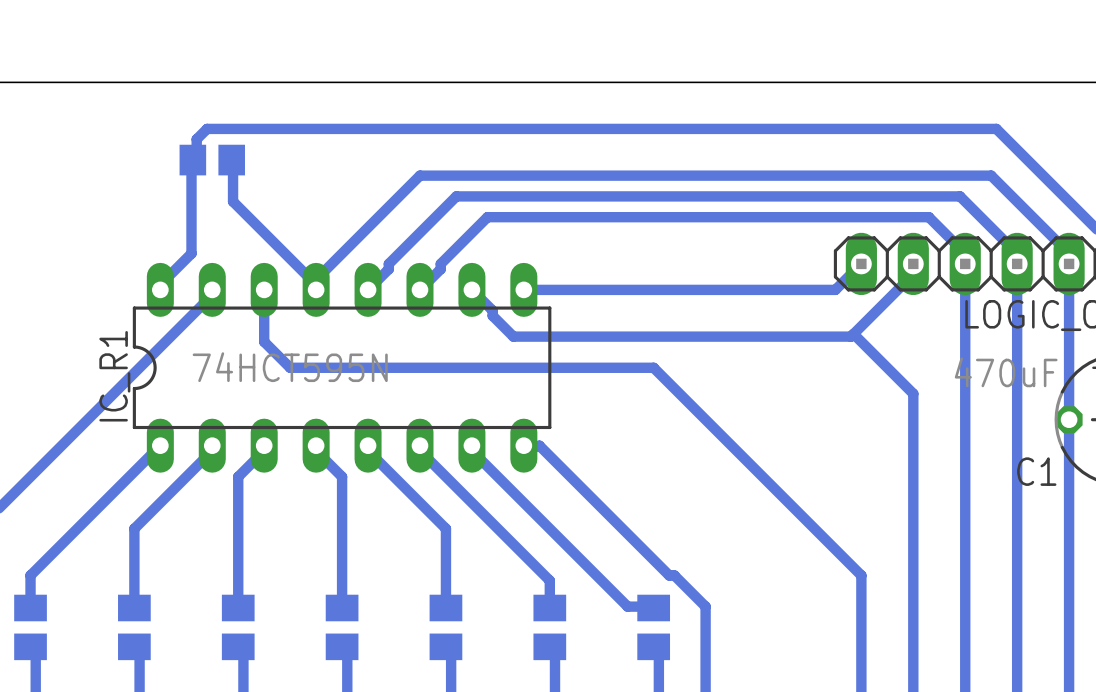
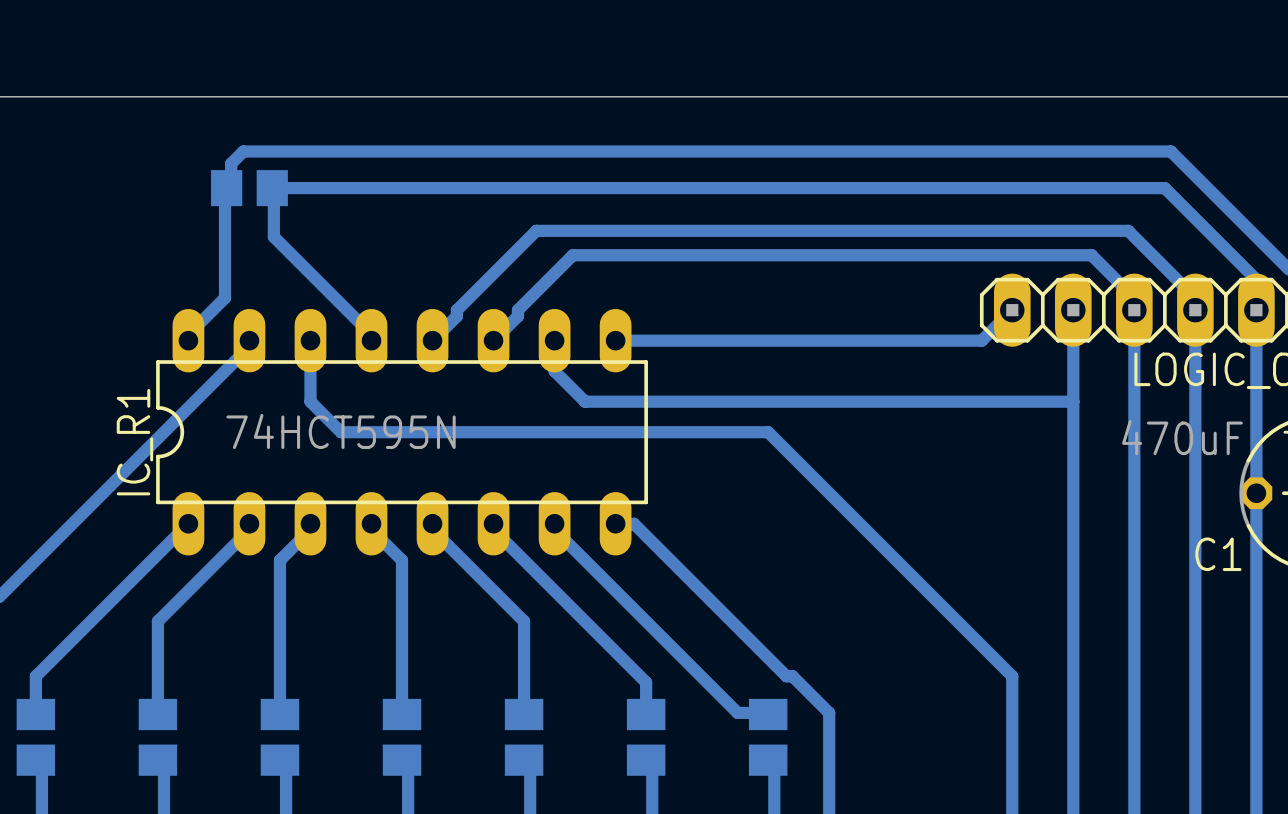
bottom track: (1069, 253) (991, 175) (419, 175) (316, 279) -> (1256, 297) (1256, 279) (1164, 188) (273, 188)
bottom track: (913, 274) (850, 336) (513, 336) (492, 315) (492, 310) (471, 289) -> (1073, 401) (585, 401) (554, 371) (554, 340)
bottom track: (853, 334) (913, 393) -> (1073, 322) (1073, 462)

